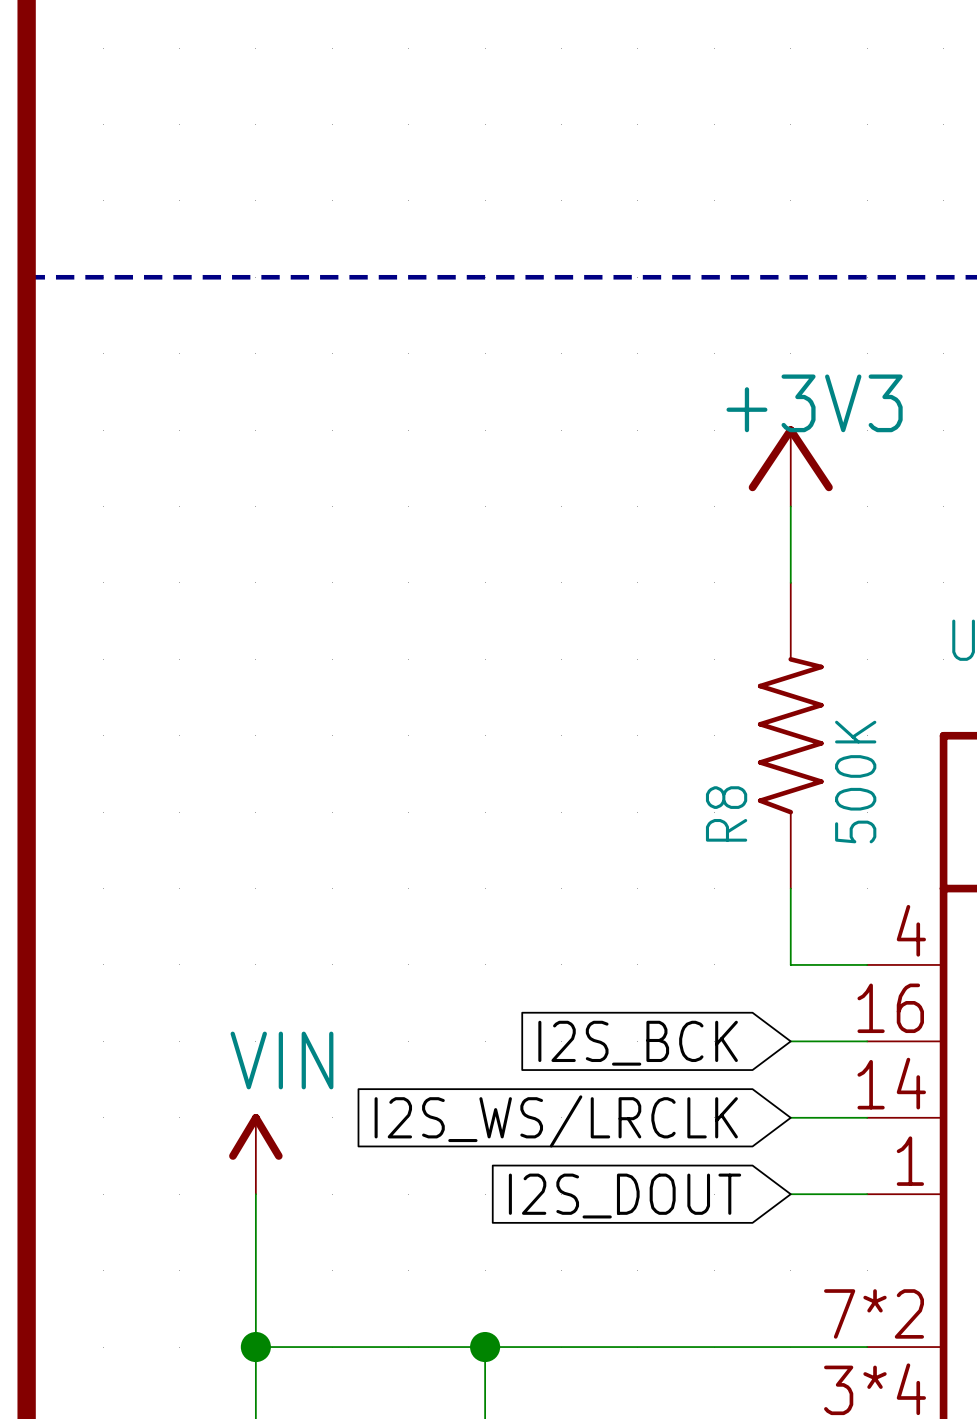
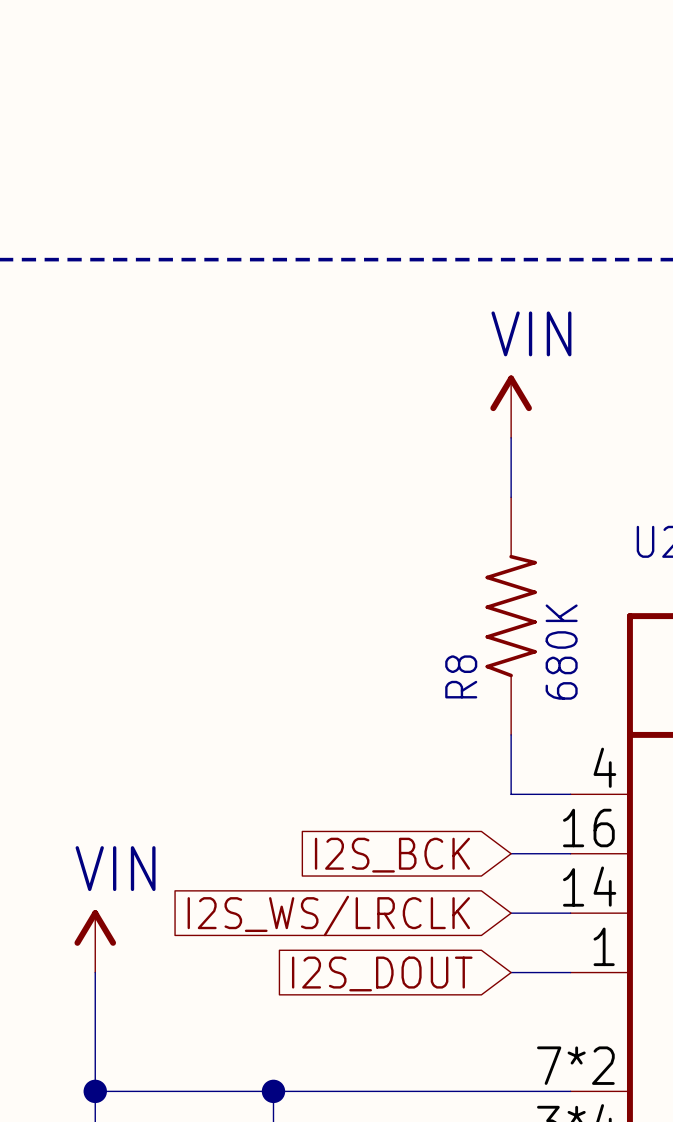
power symbol: +3V3 (790, 466) -> VIN (511, 406)
R8 value: 500K (855, 782) -> 680K (561, 652)

